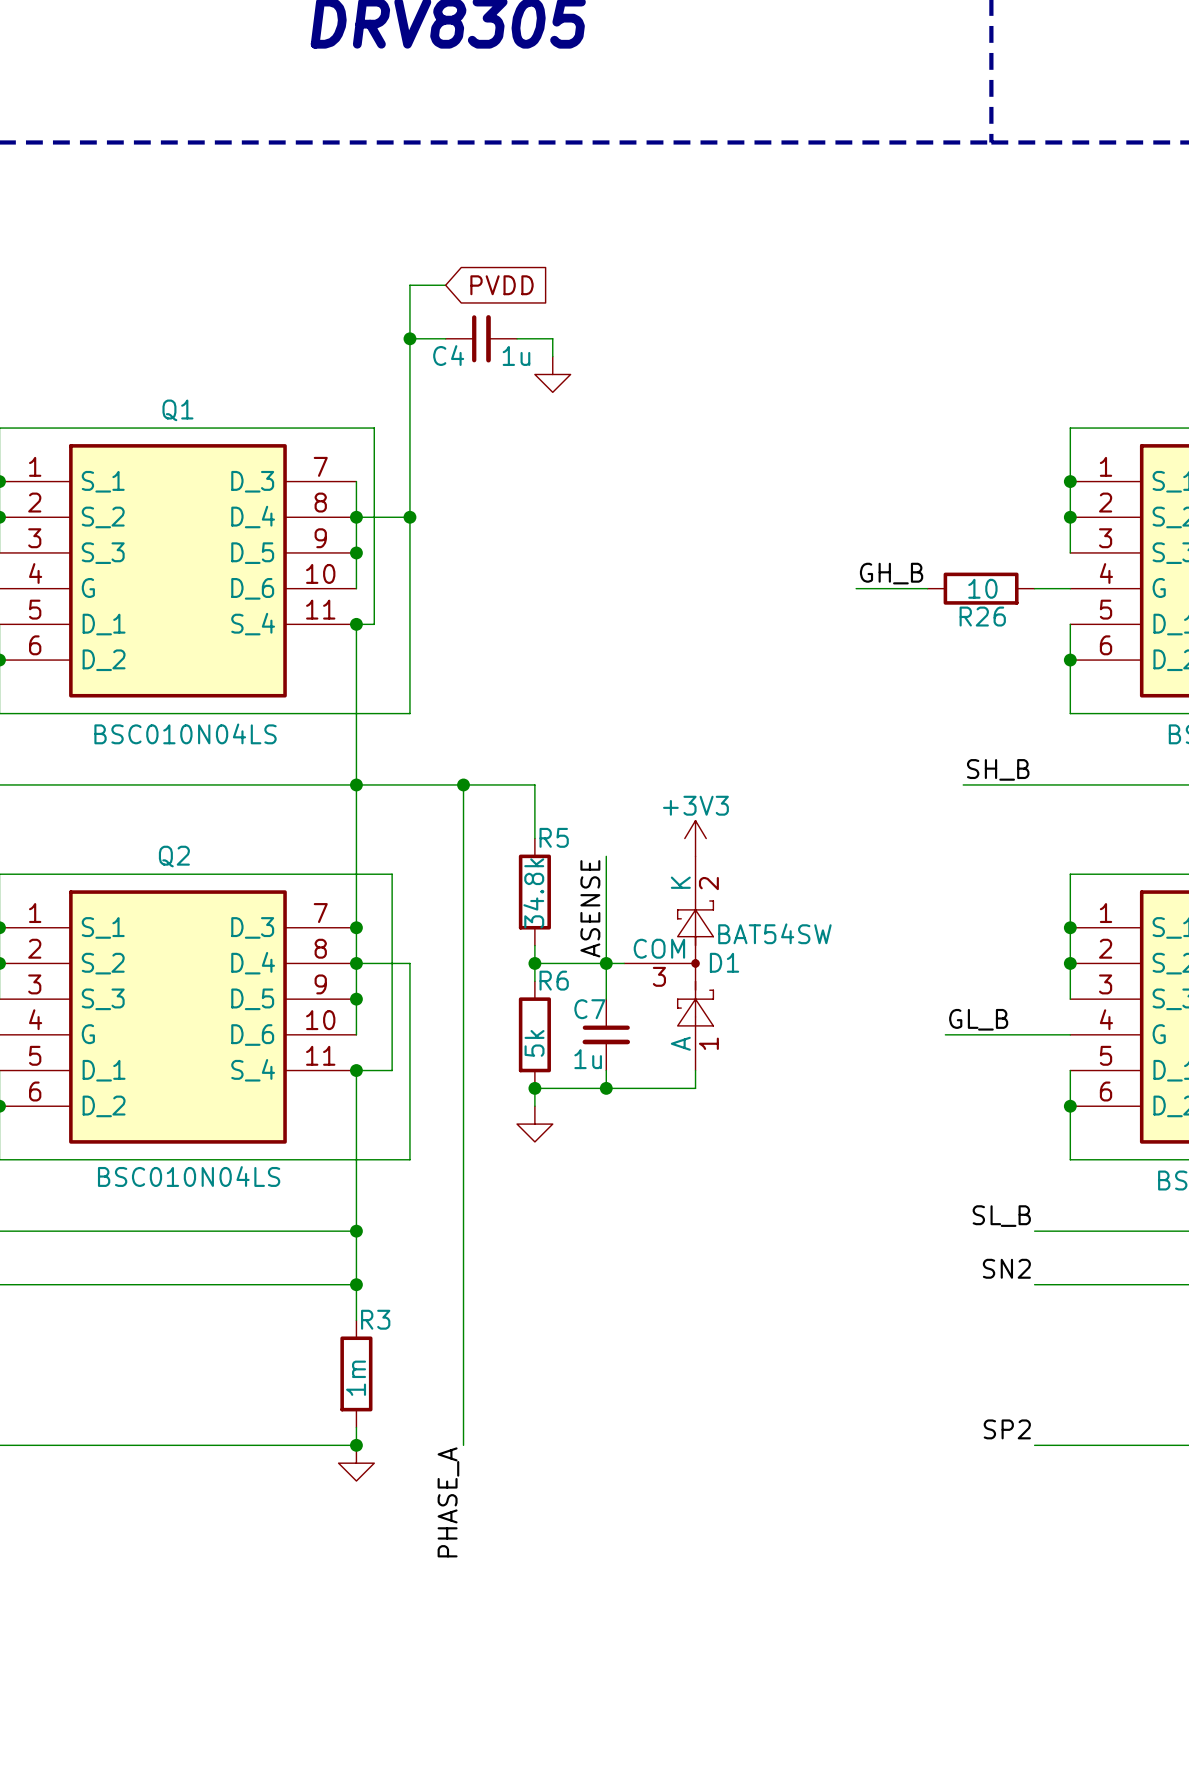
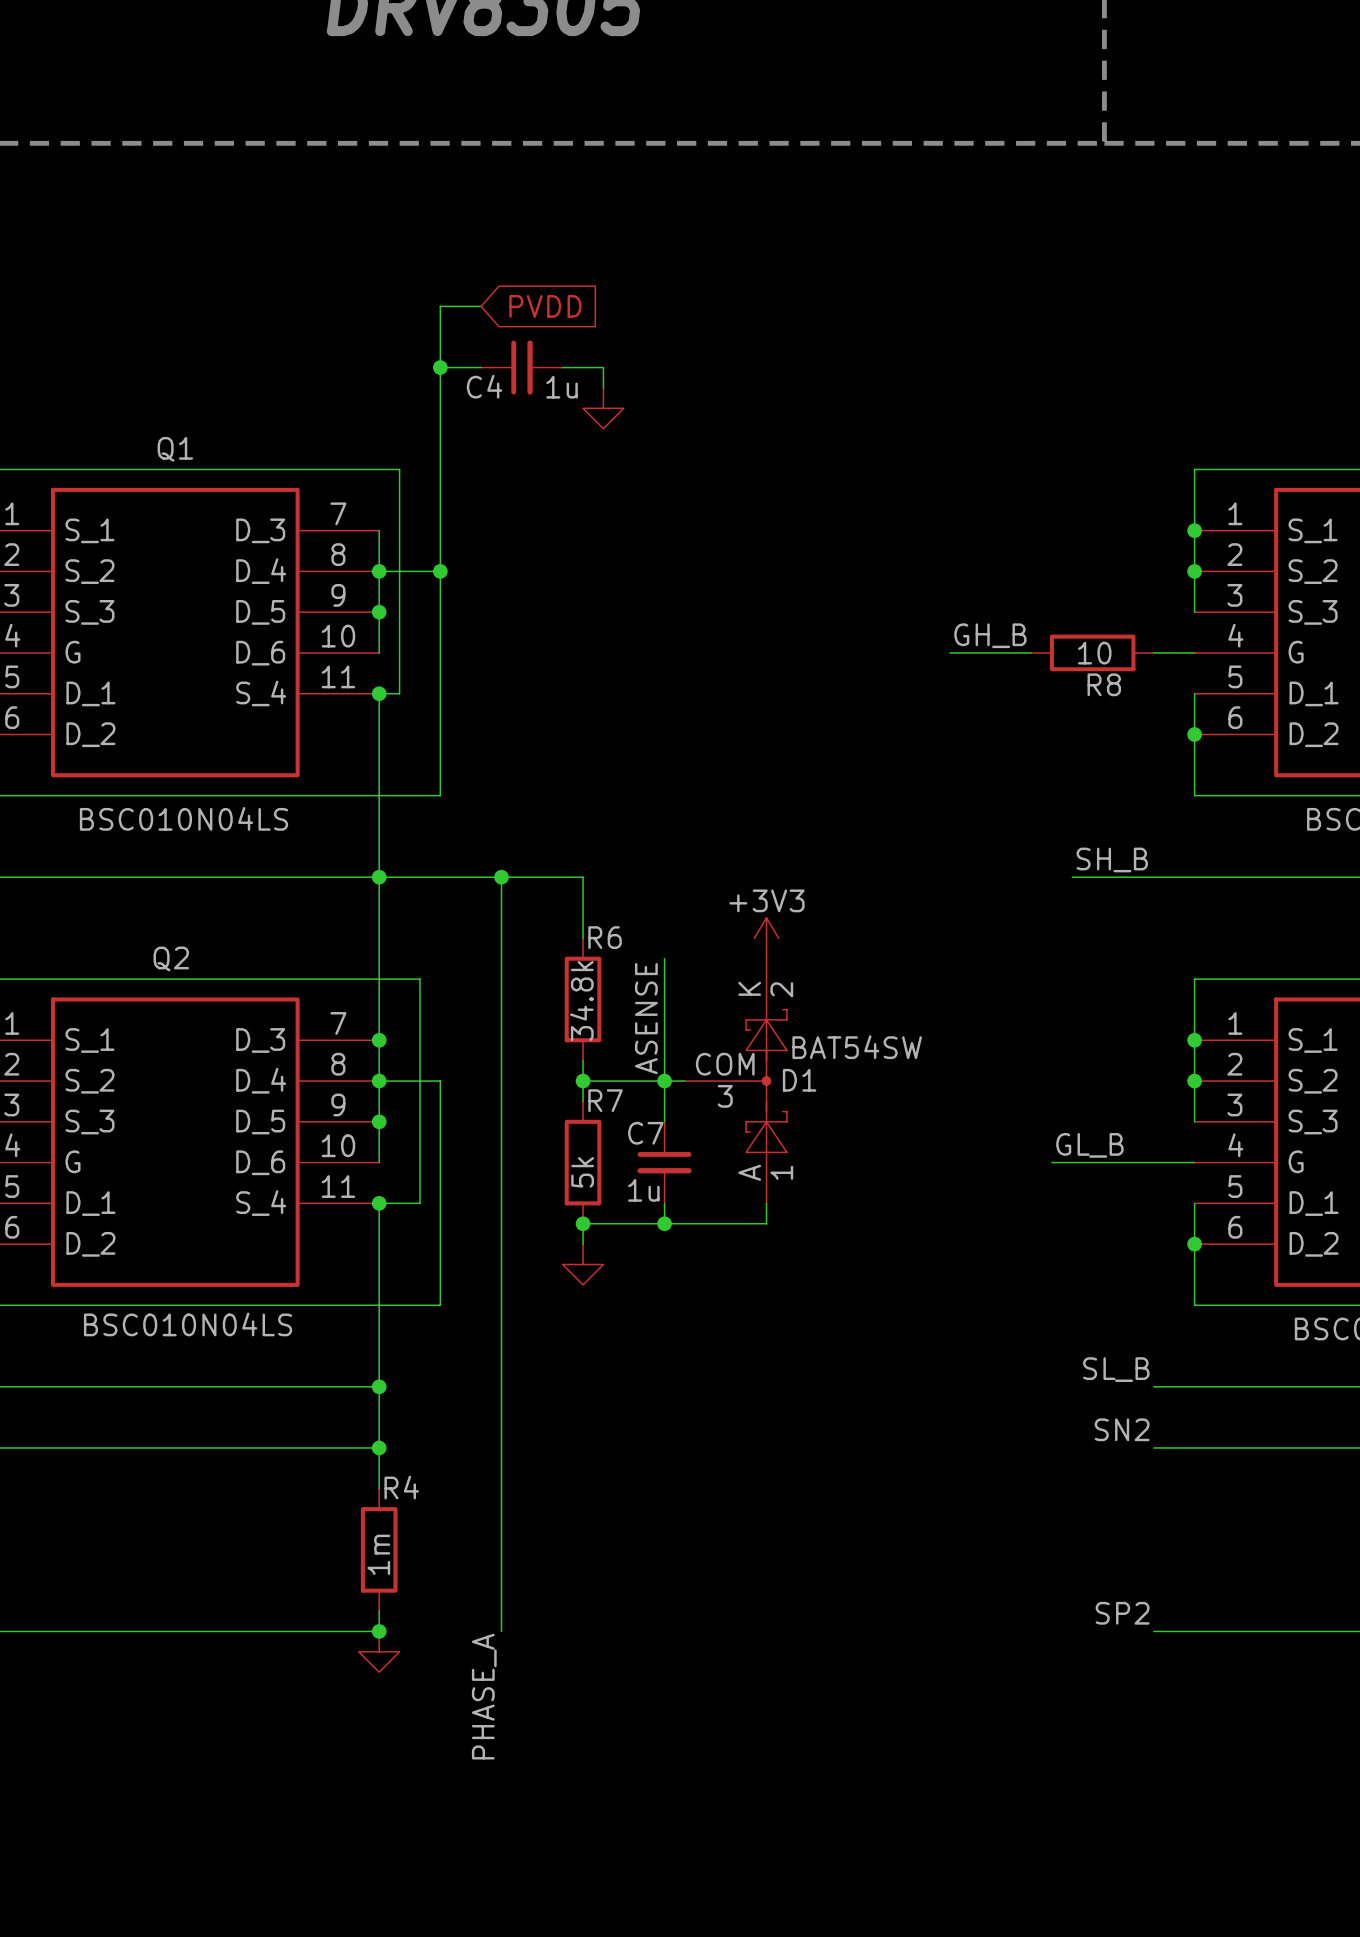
R26 name: R26 (982, 616) -> R8 (1104, 684)
R5 name: R5 (554, 837) -> R6 (605, 937)
R6 name: R6 (554, 980) -> R7 (605, 1100)
R3 name: R3 (375, 1319) -> R4 (401, 1487)

